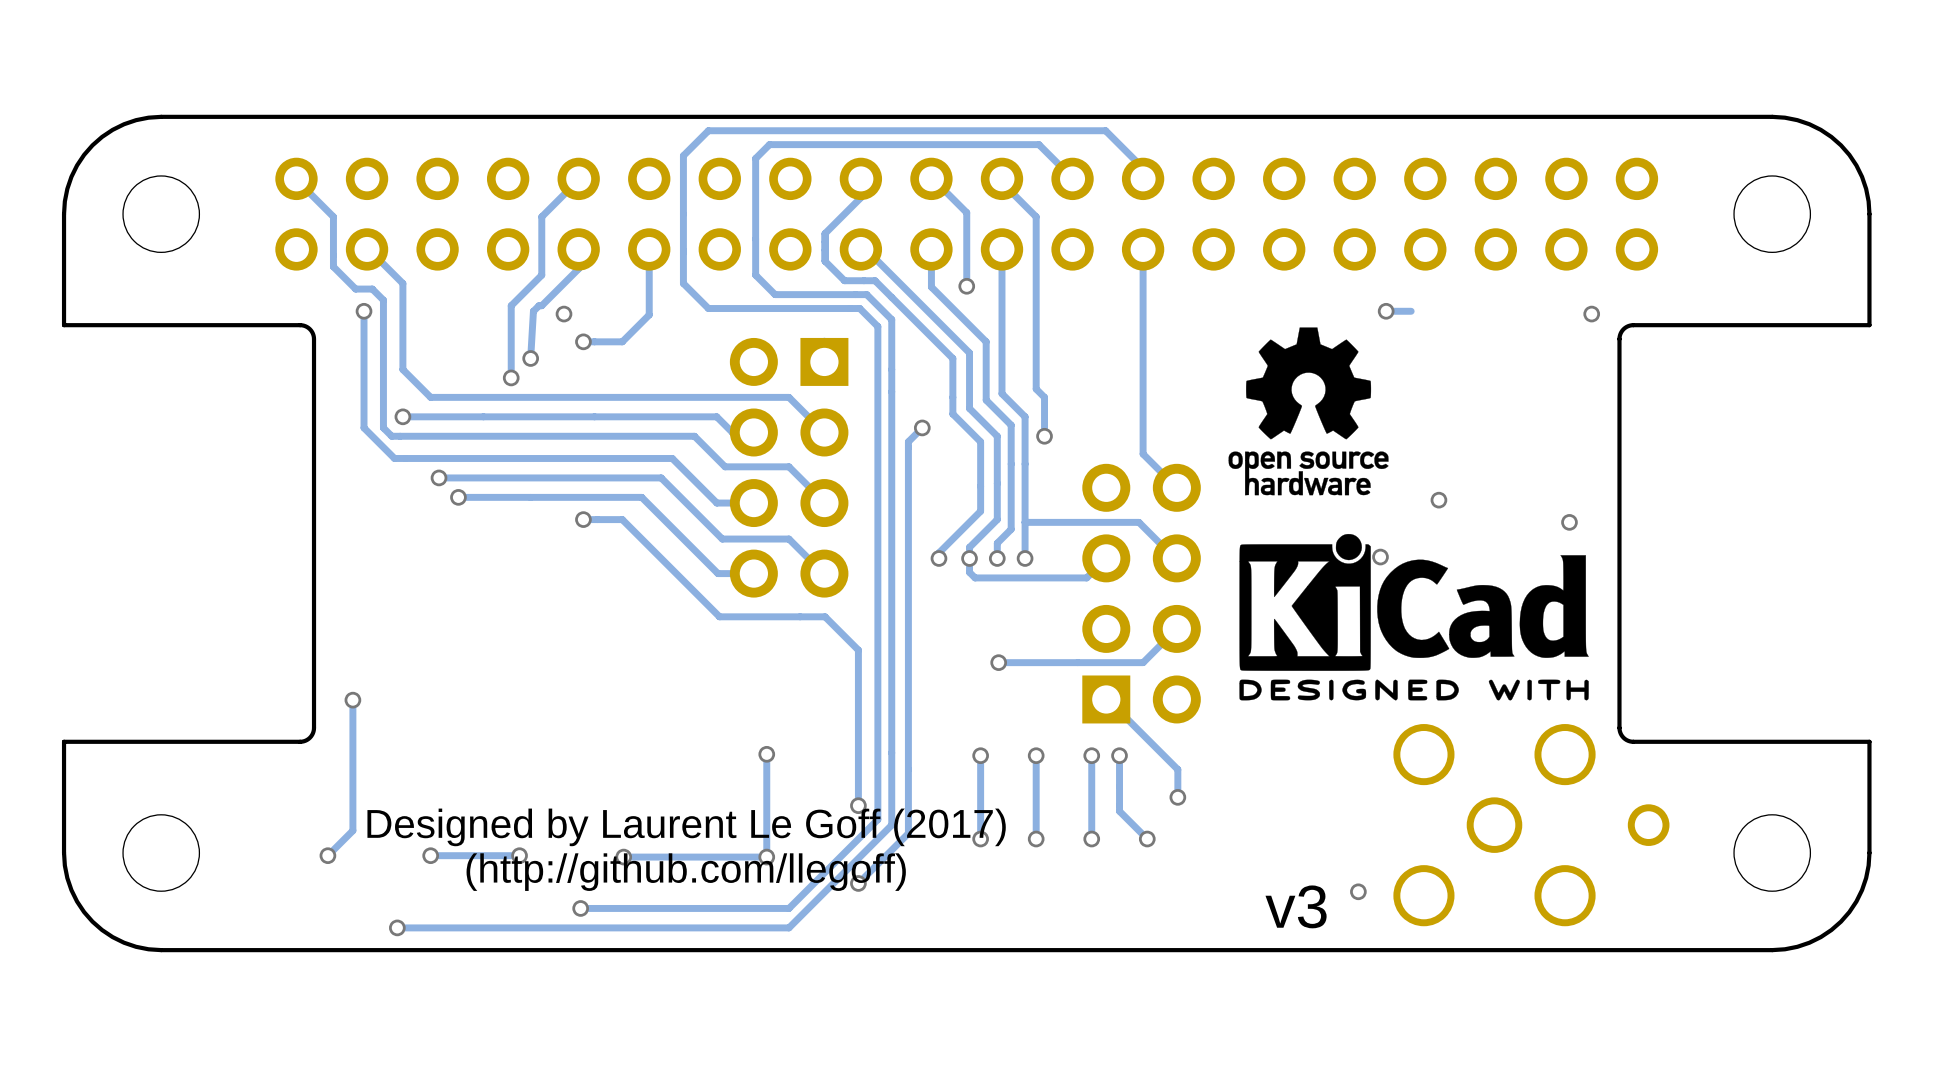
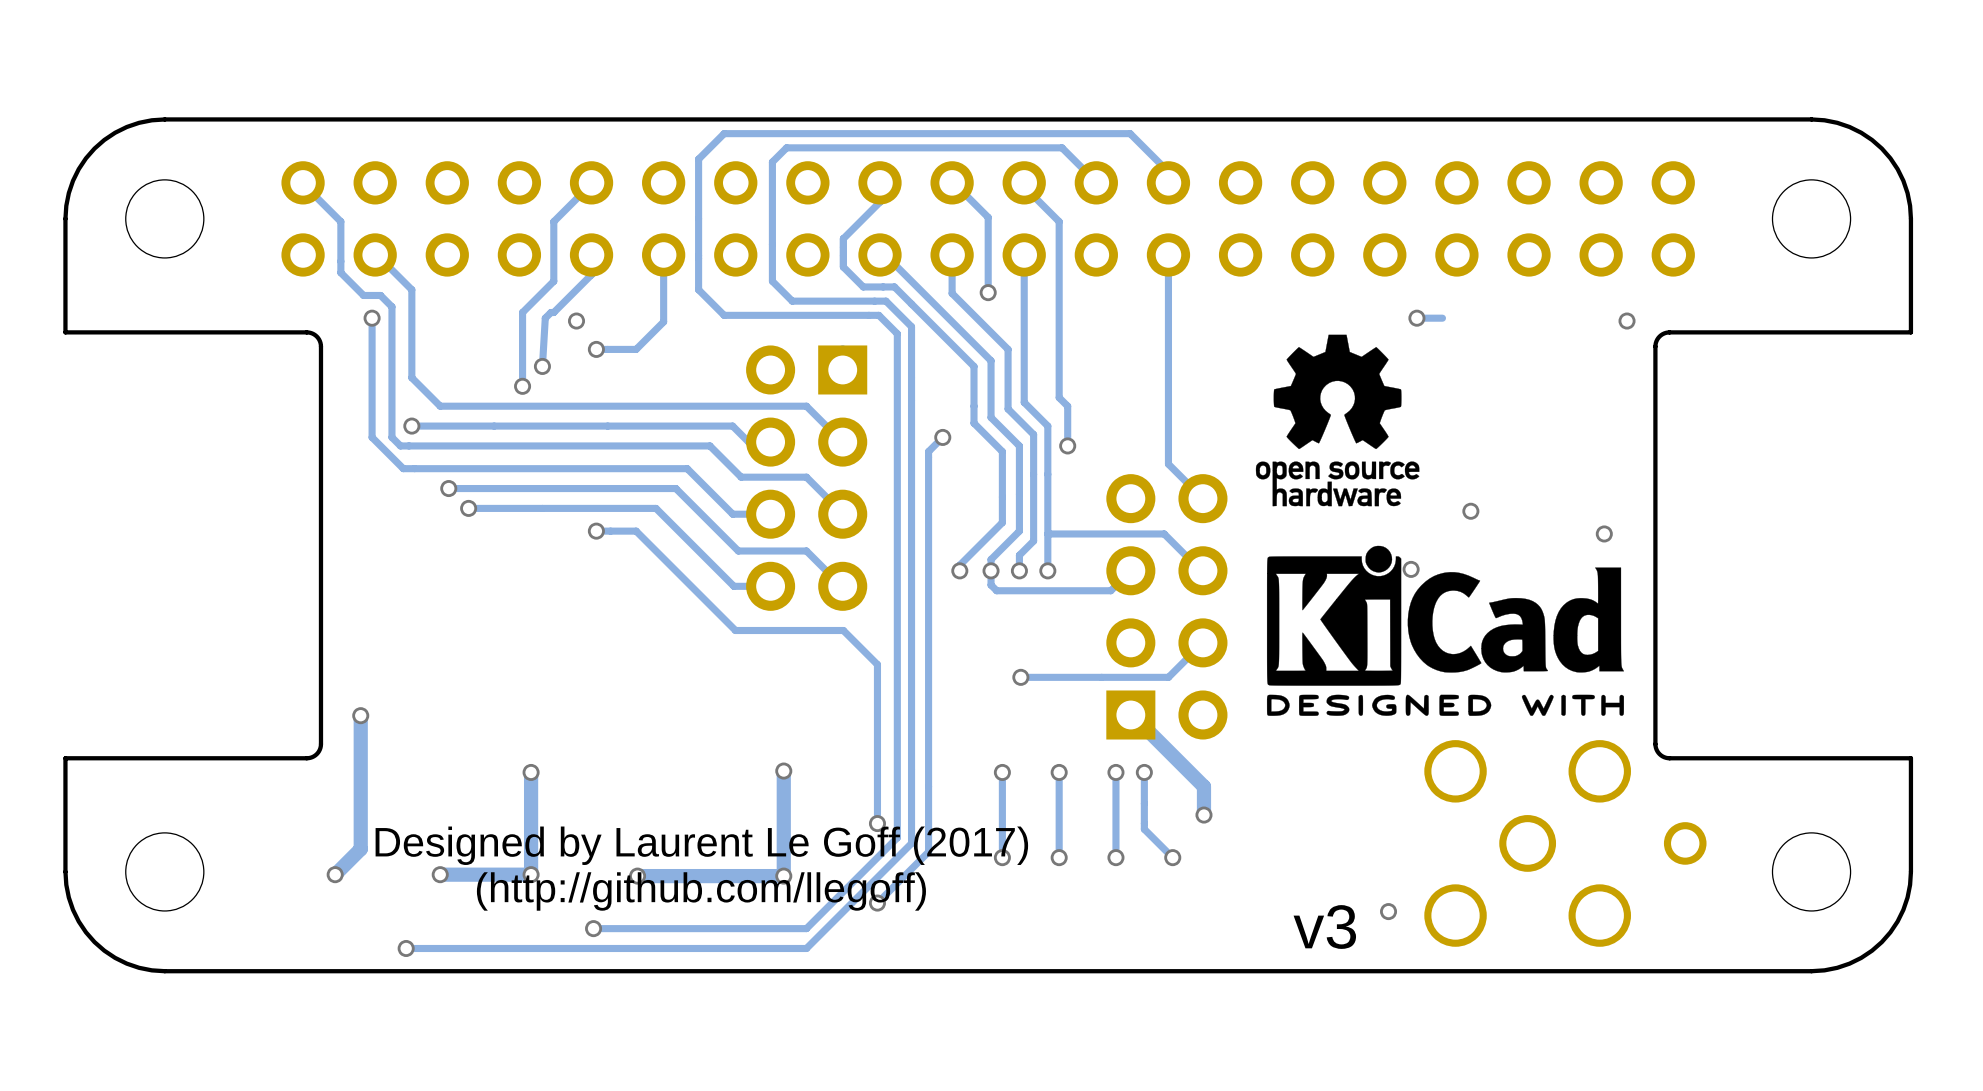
track width: thin (1107, 699) (1177, 769) (1177, 797) -> thick (1132, 714) (1203, 786) (1203, 815)
track width: thin (352, 700) (352, 830) (327, 855) -> thick (360, 715) (360, 849) (335, 874)
track width: thin (766, 754) (766, 857) (623, 857) -> thick (783, 771) (783, 876) (637, 876)
track: none -> (531, 772) (531, 874)
via: none -> (531, 772)
track width: thin (519, 855) (430, 855) -> thick (531, 874) (440, 874)

